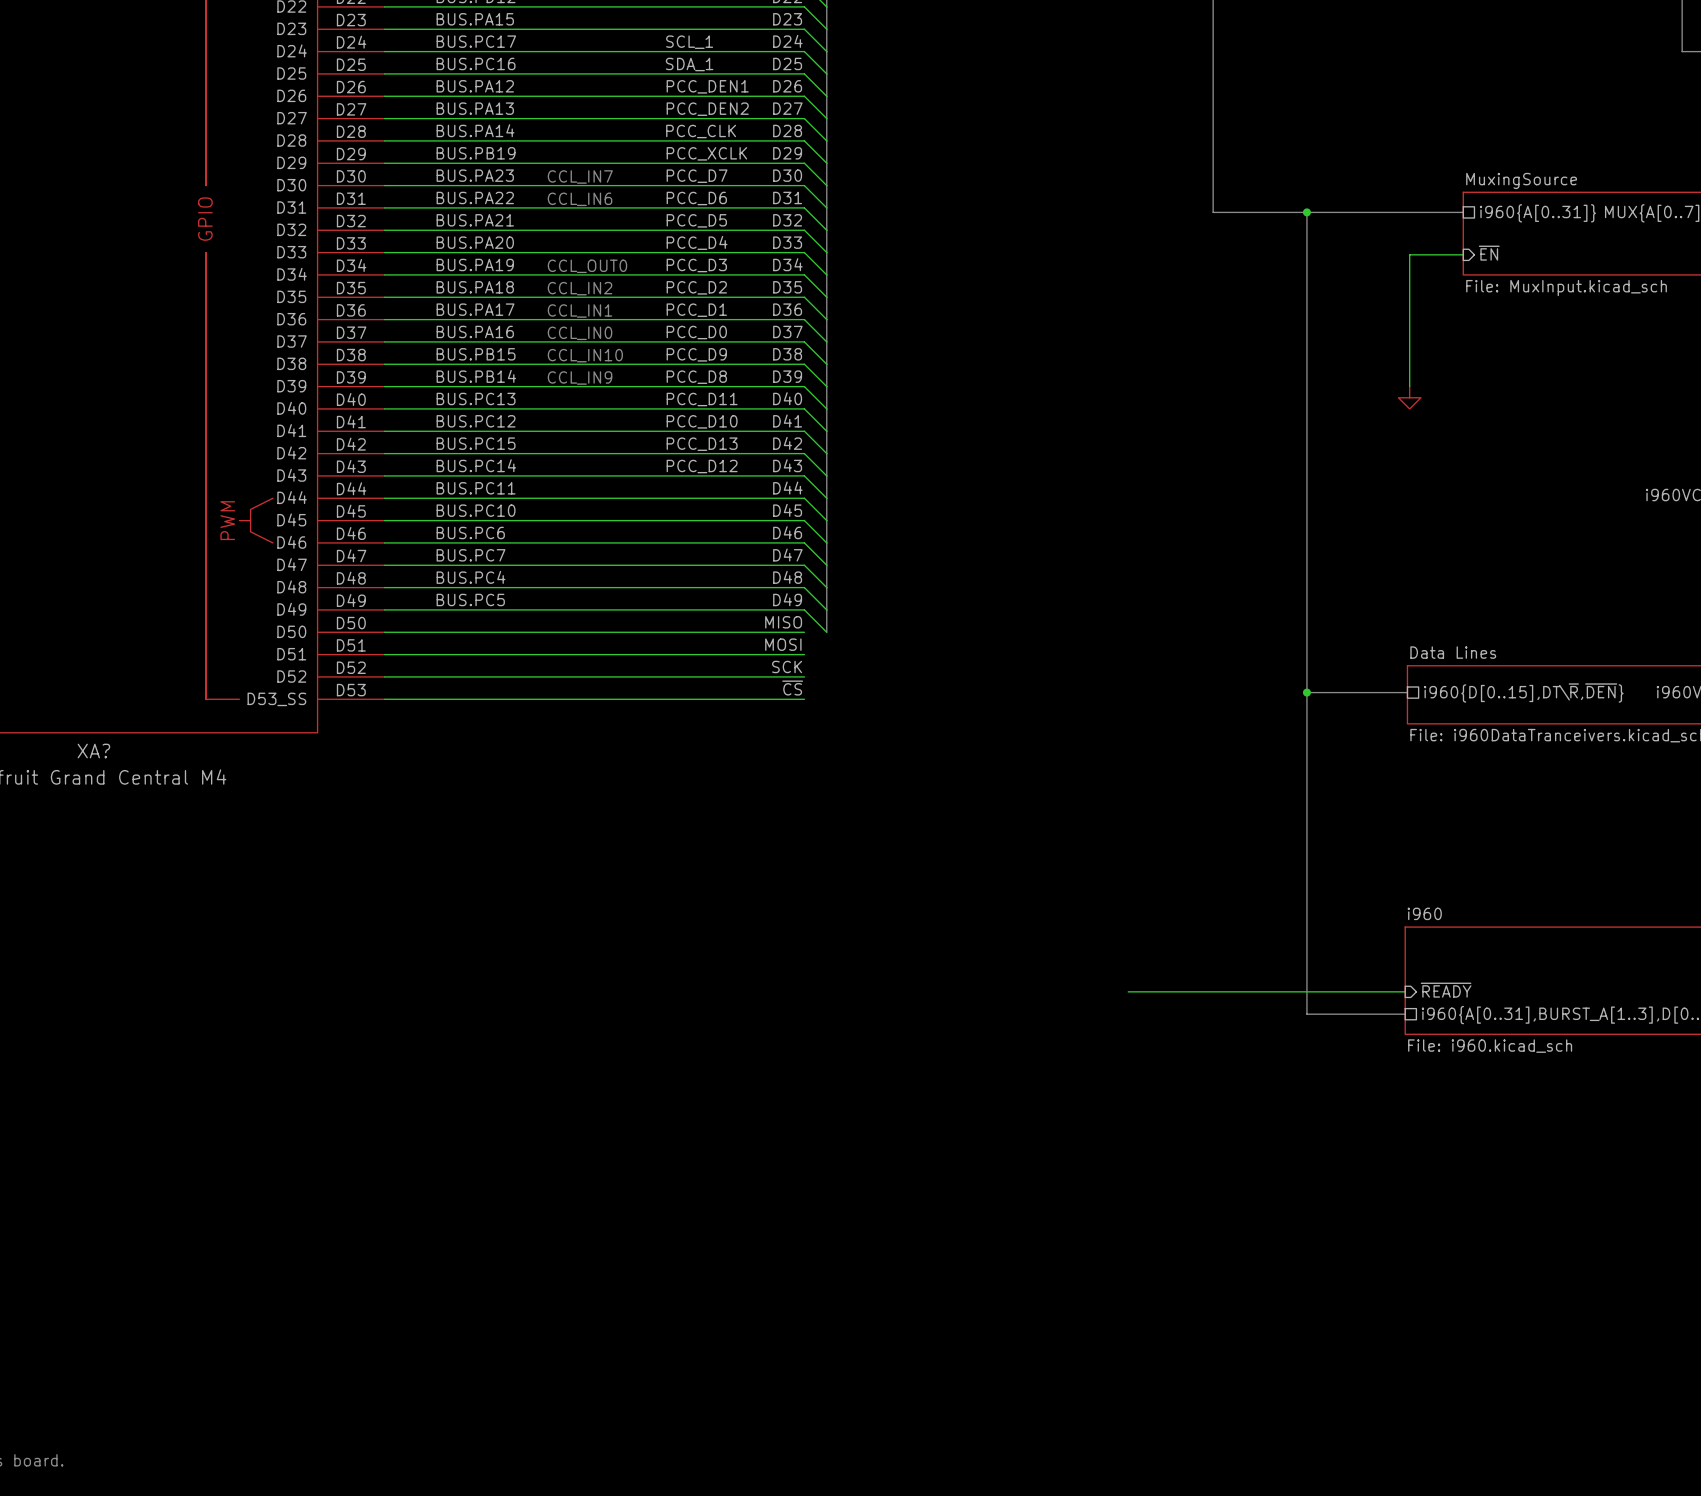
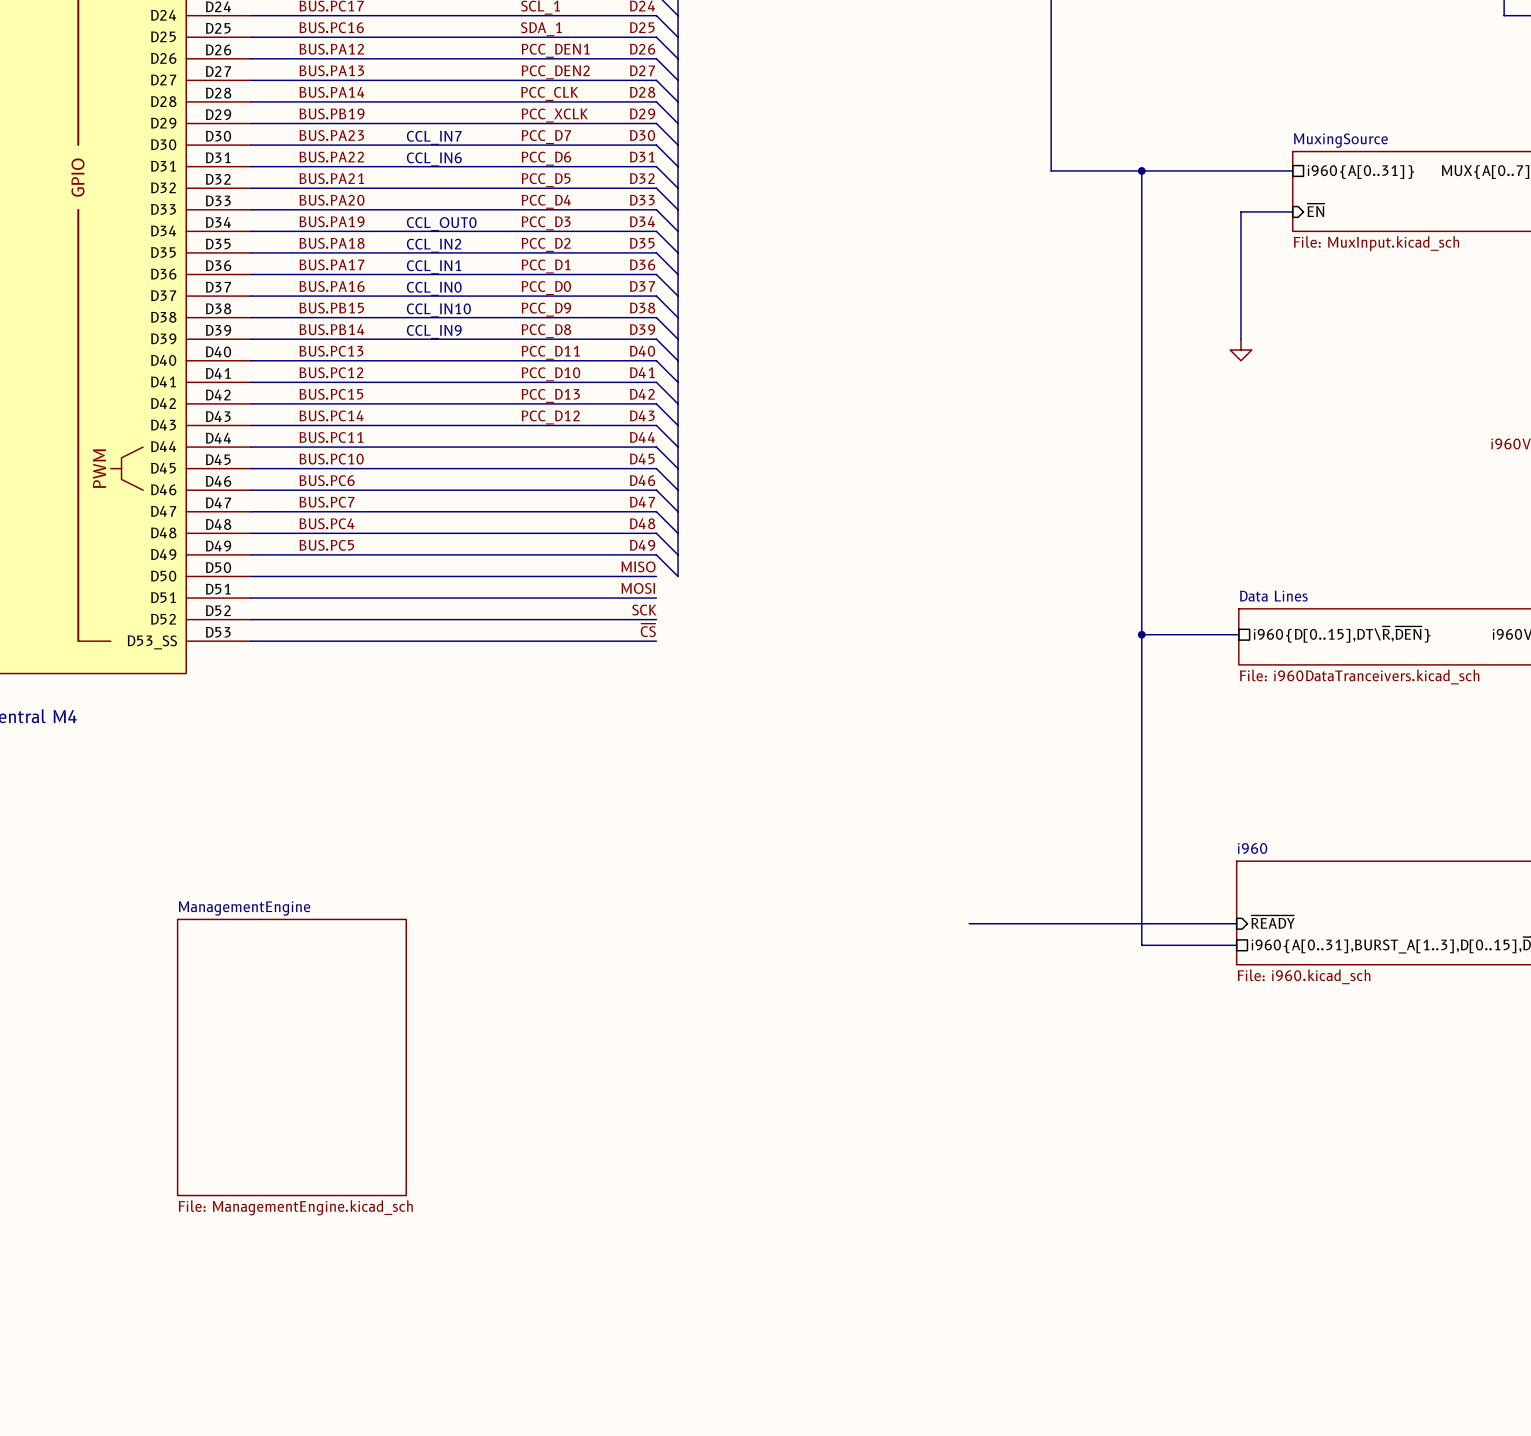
sheet ManagementEngine: none -> File: ManagementEngine.kicad_sch (291, 1057)

